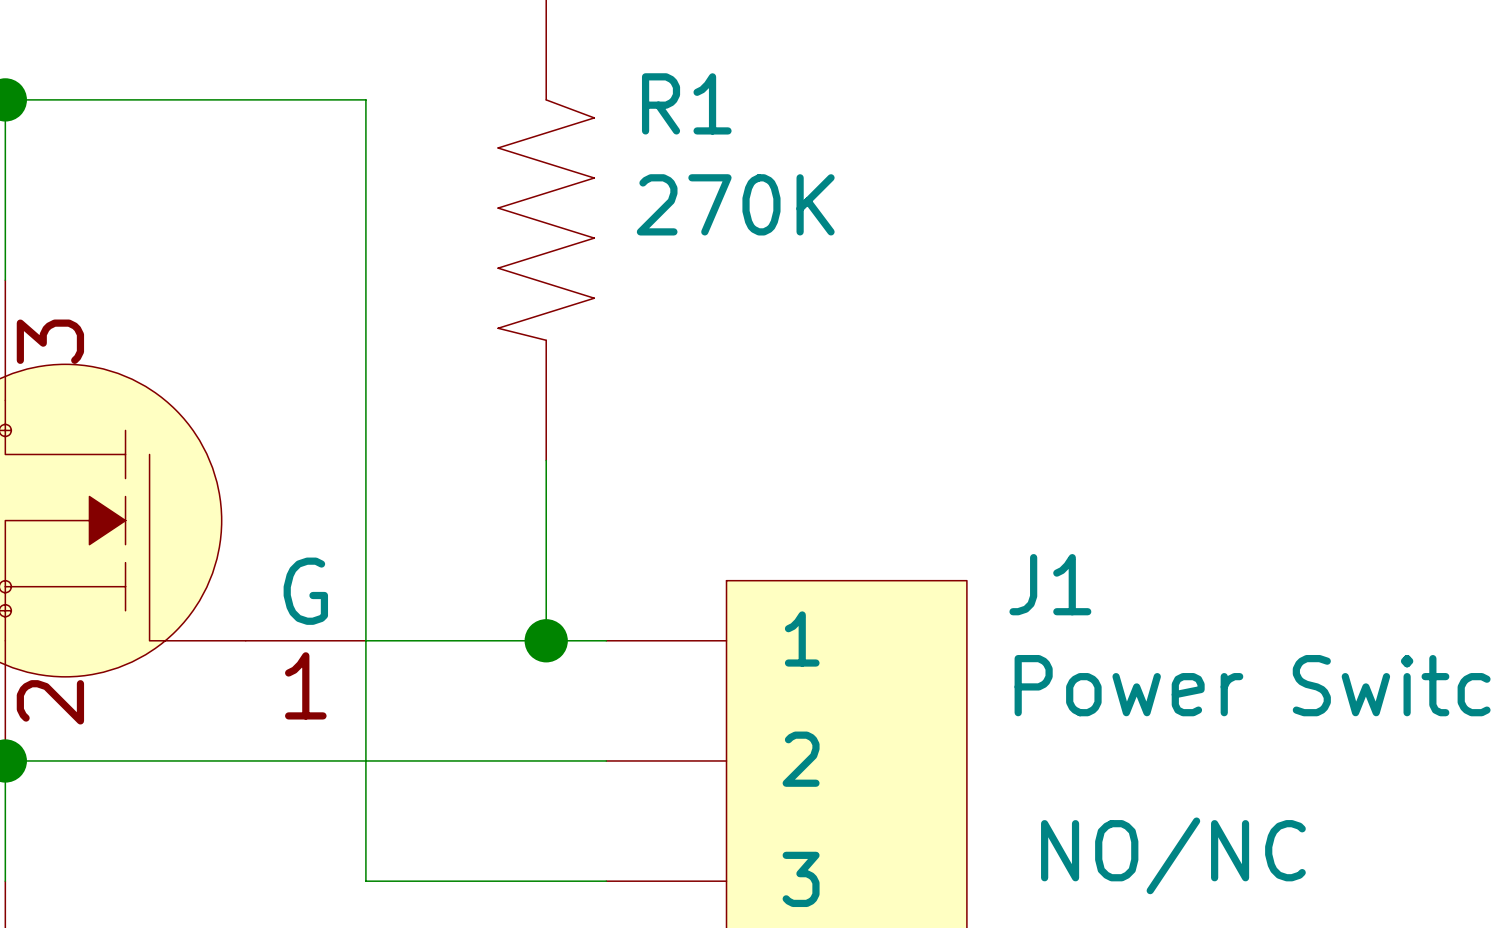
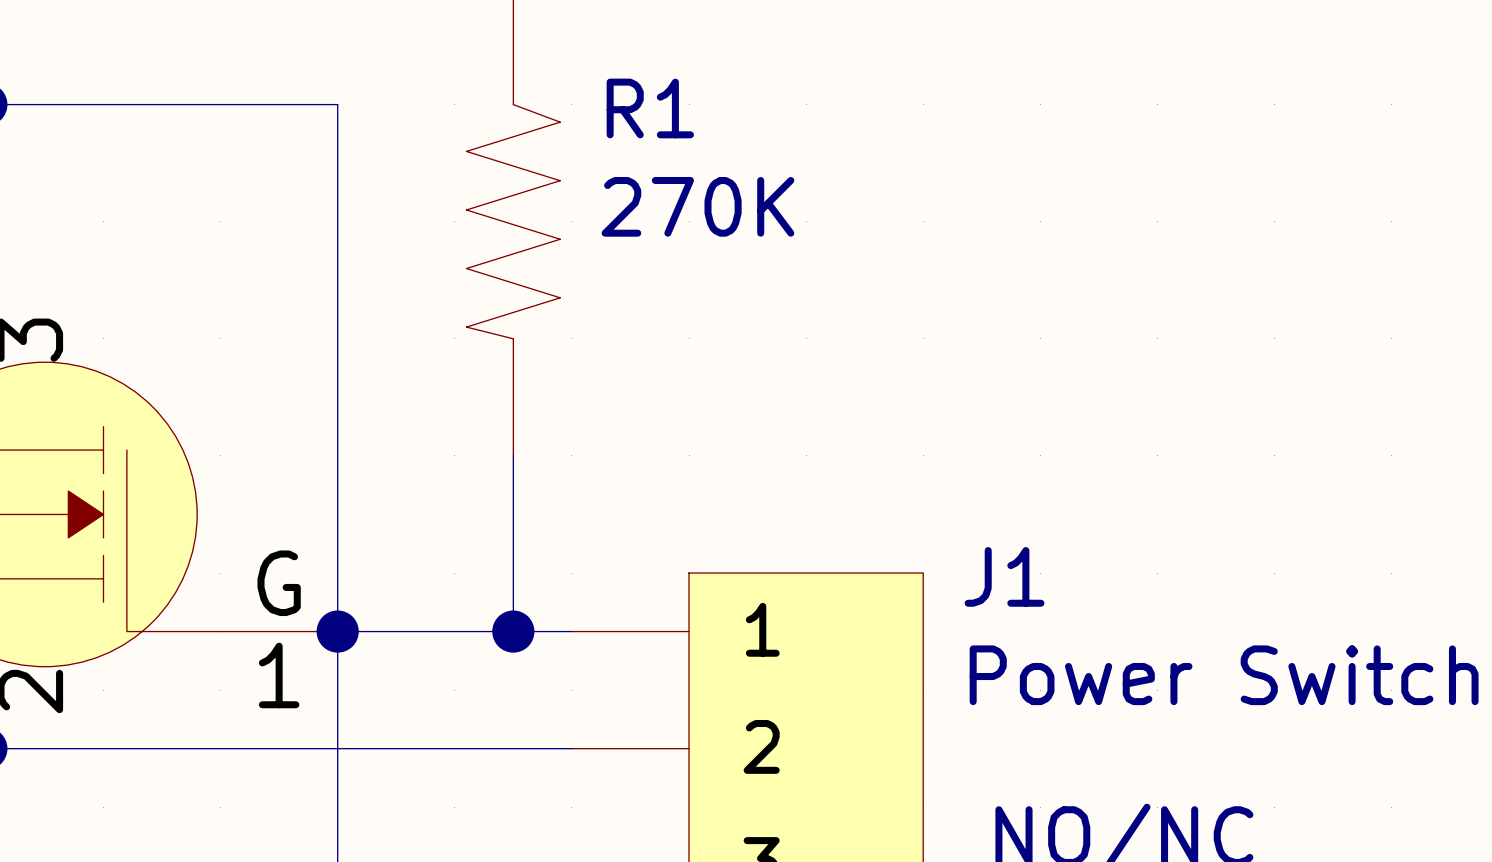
junction: none -> (337, 631)

